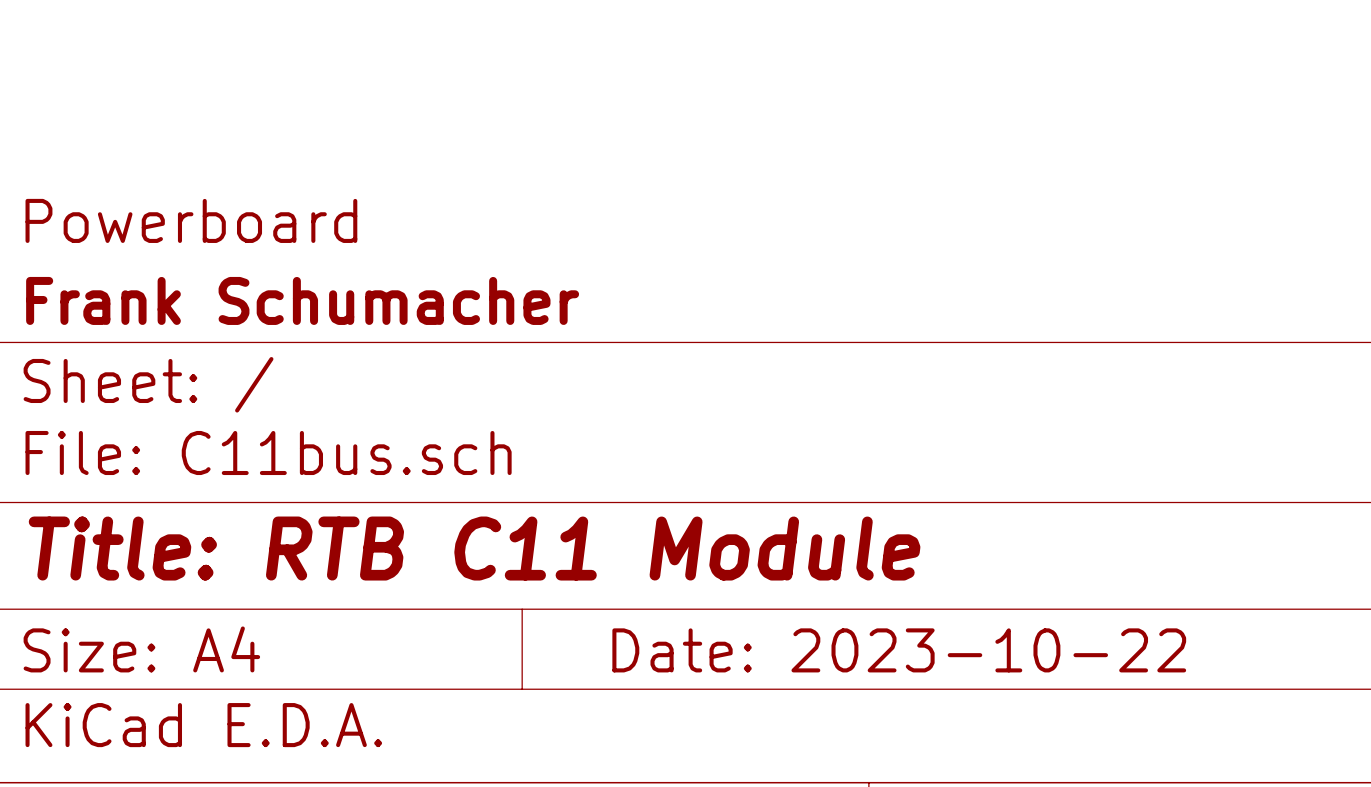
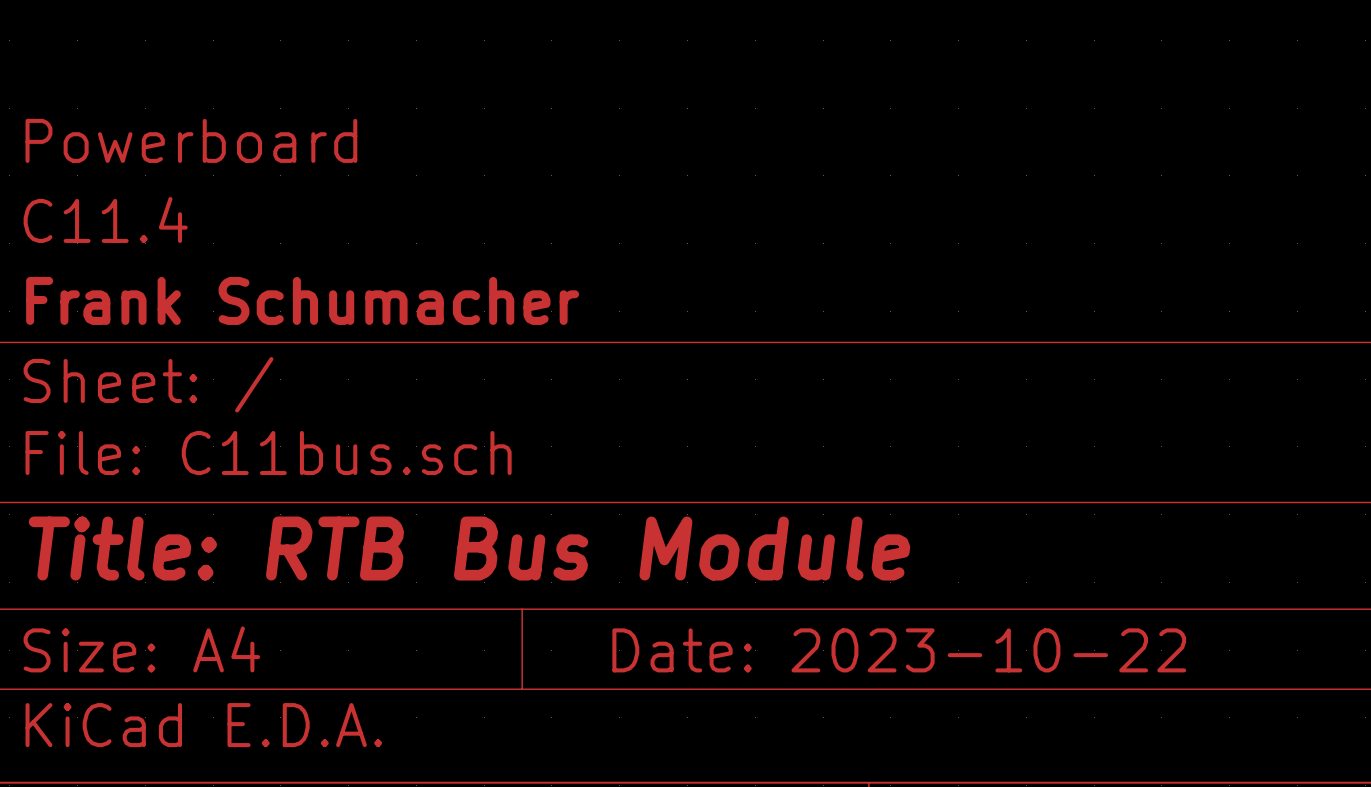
title block: none -> Powerboard (191, 140)
title block: Powerboard (191, 220) -> C11.4 (105, 219)
title block: Title: RTB C11 Module (474, 548) -> Title: RTB Bus Module (469, 548)

